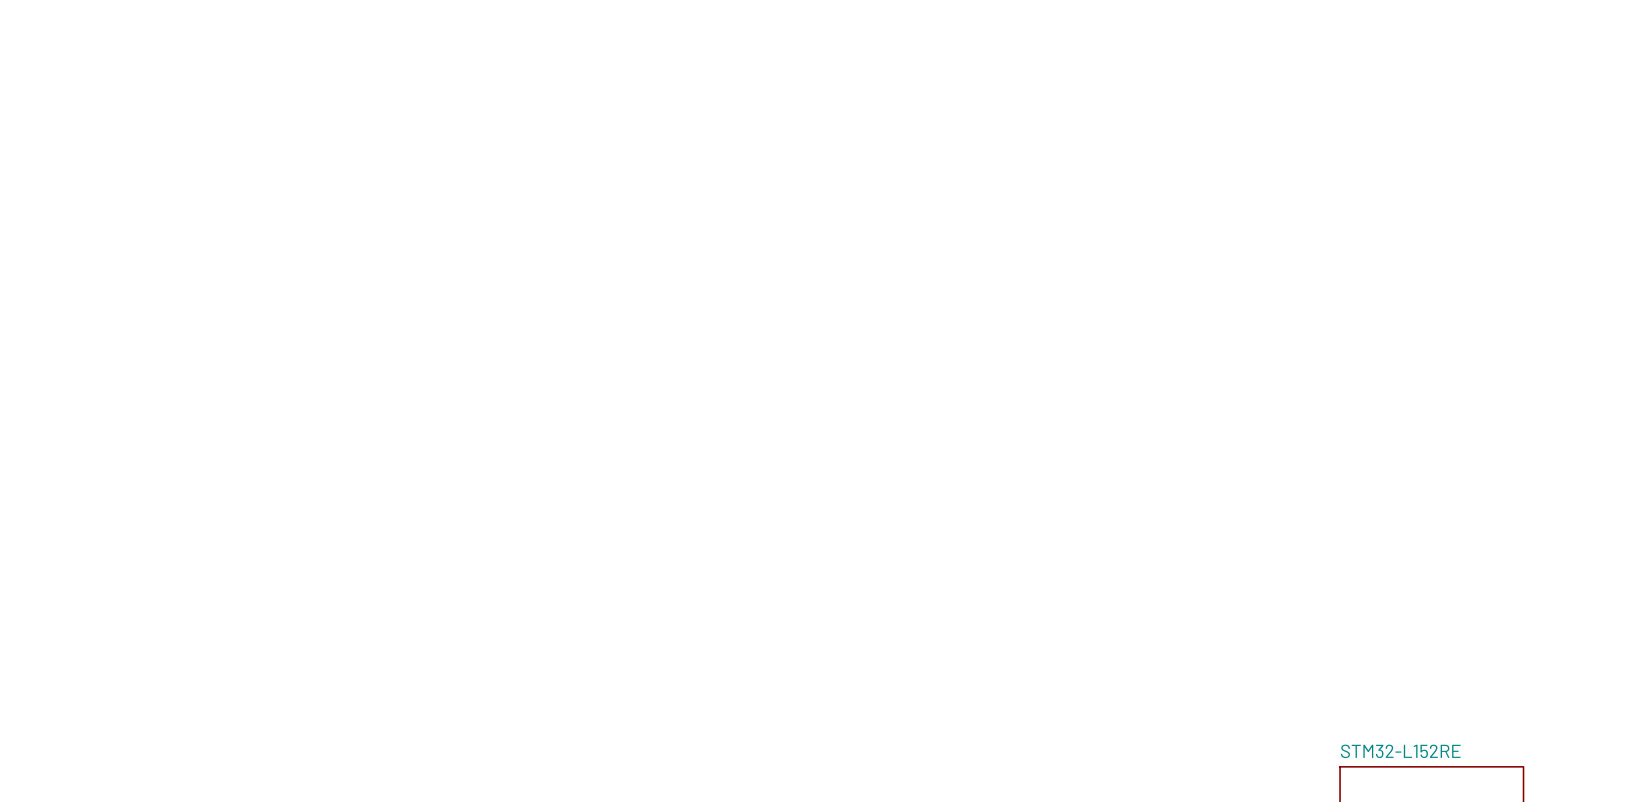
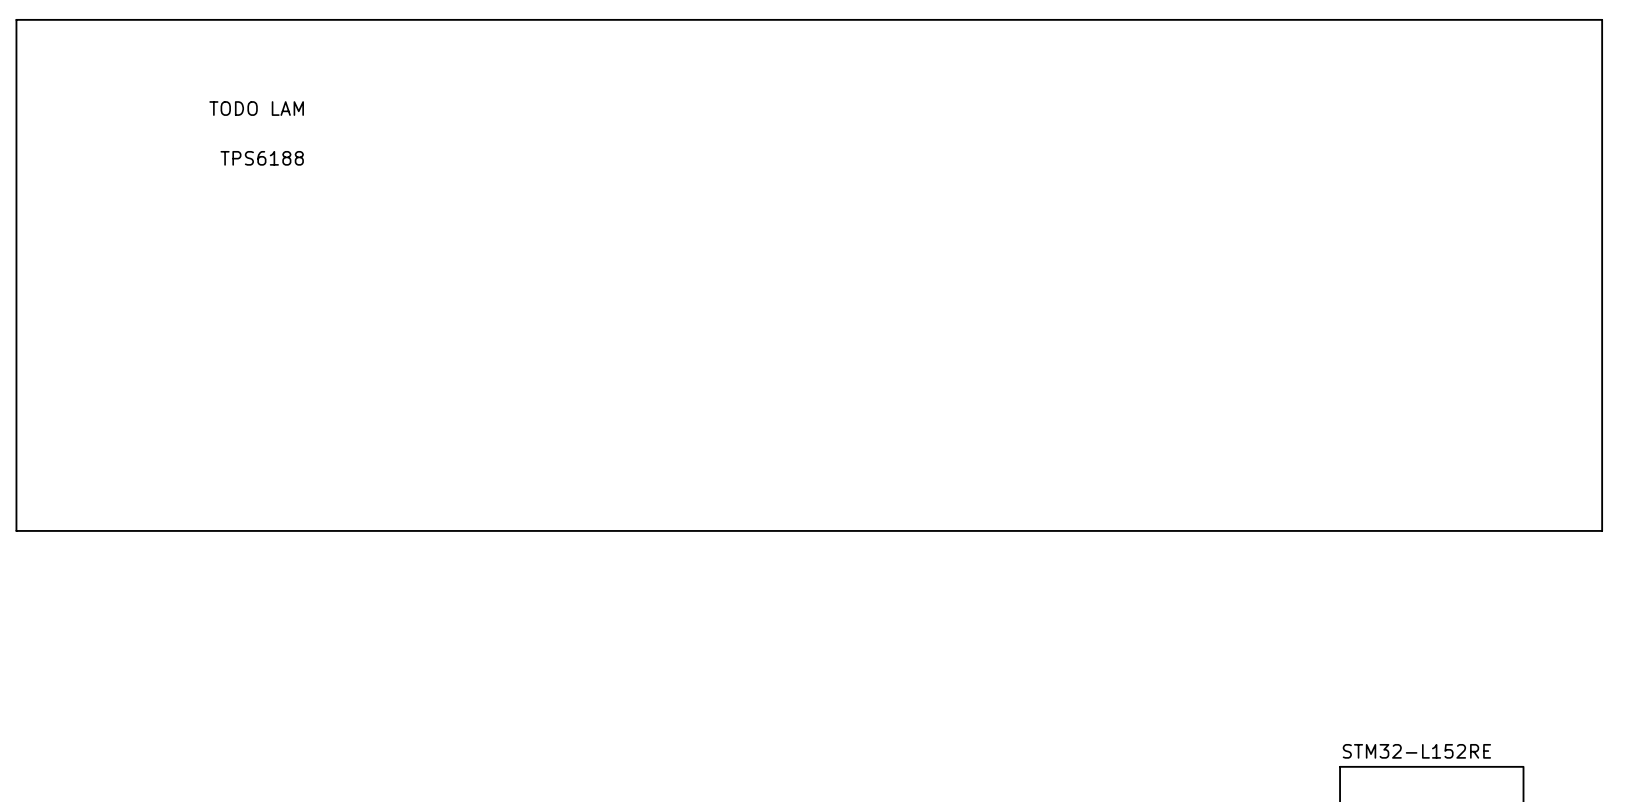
line: none -> (16, 19) (1602, 19) (1602, 530) (16, 530) (16, 19)
text: none -> TODO LAM (256, 108)
text: none -> TPS6188 (262, 158)

